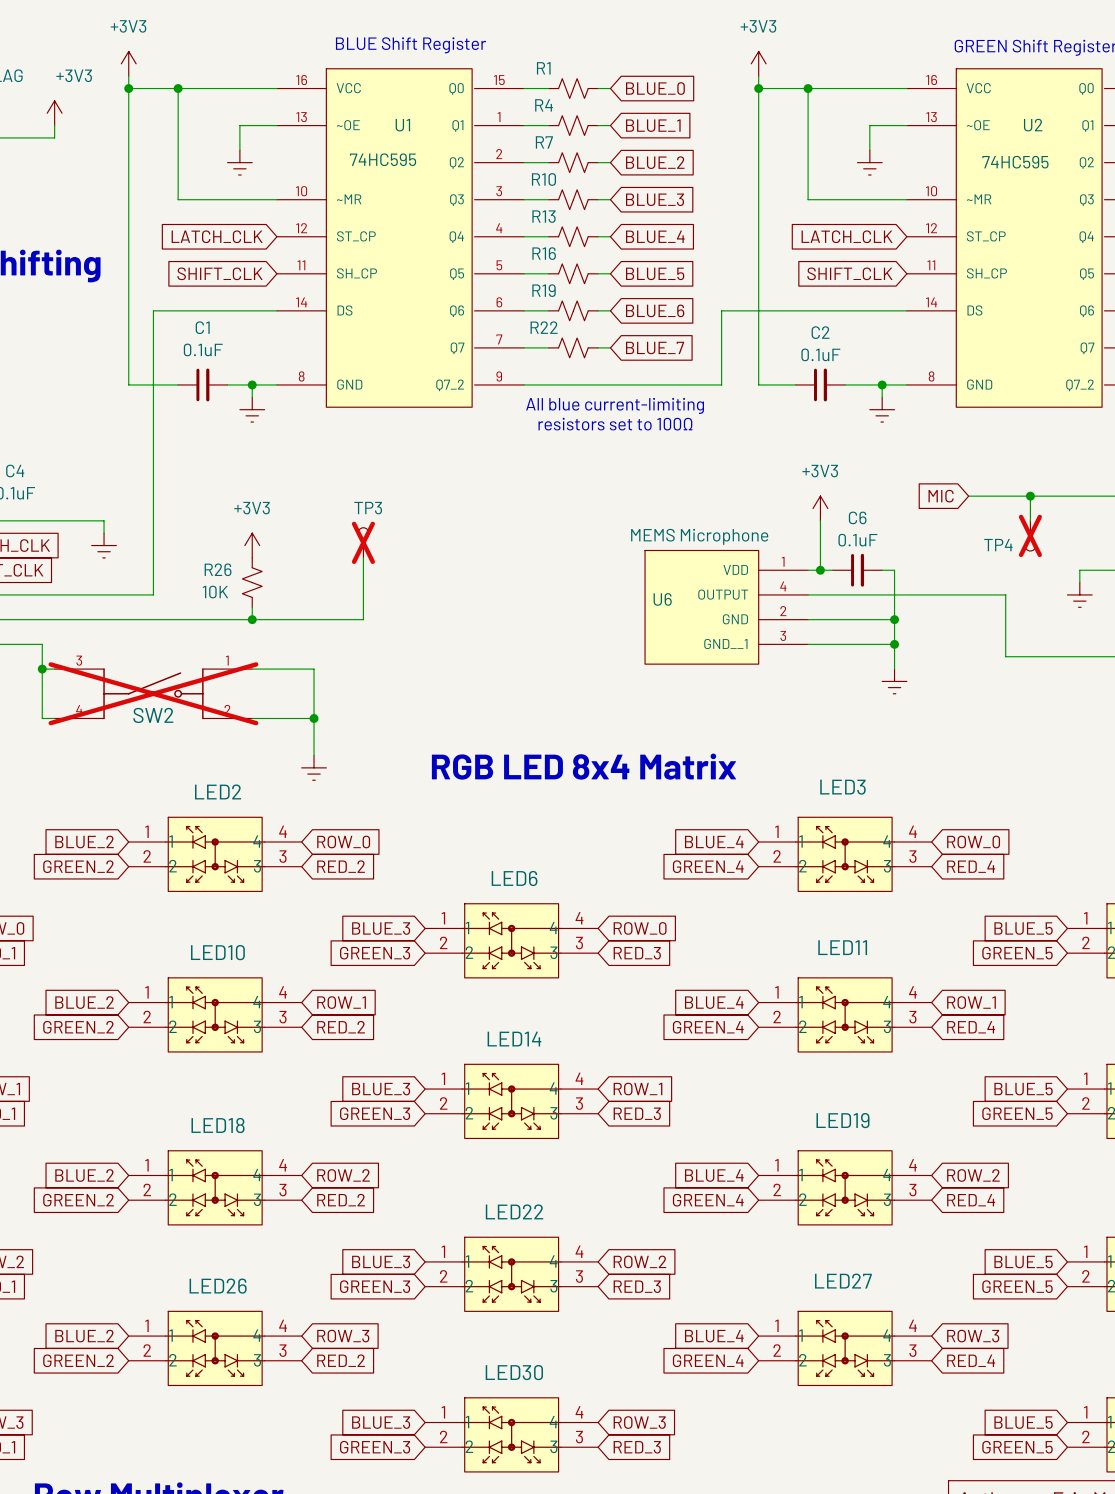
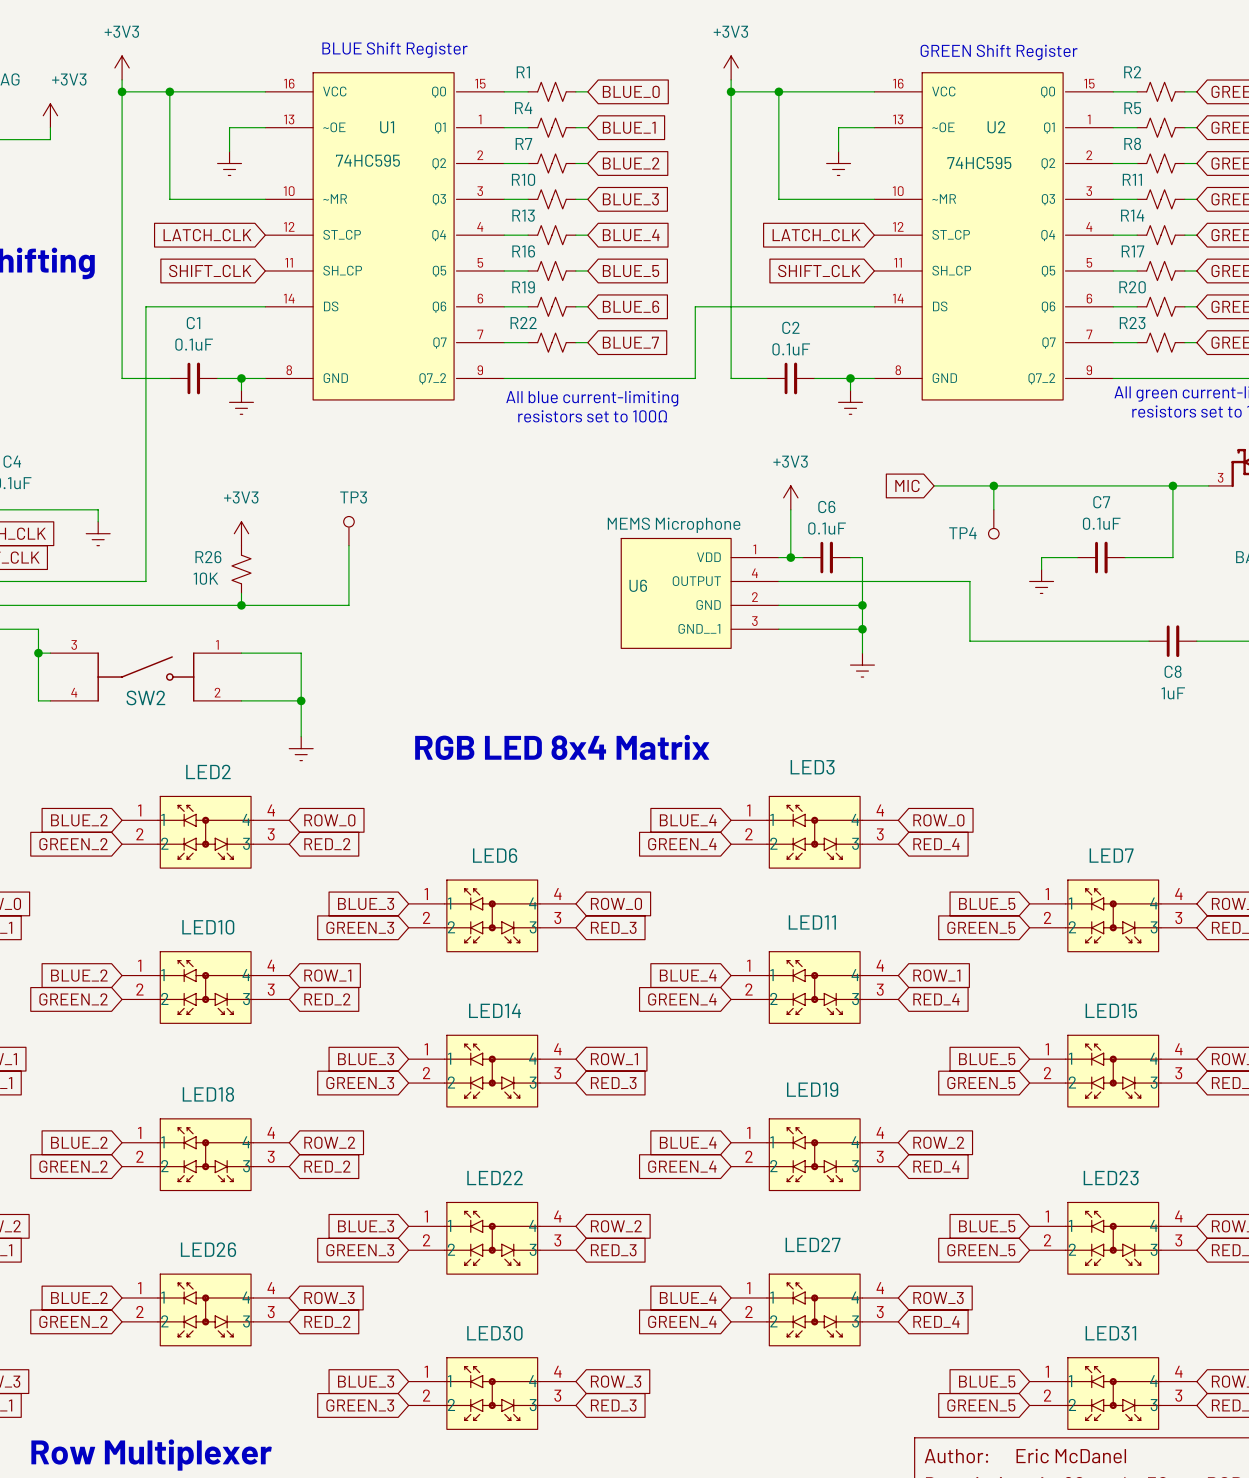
TP4 do-not-place cross: (1030, 535) -> none
TP3 do-not-place cross: (363, 542) -> none
SW2 do-not-place cross: (153, 693) -> none

